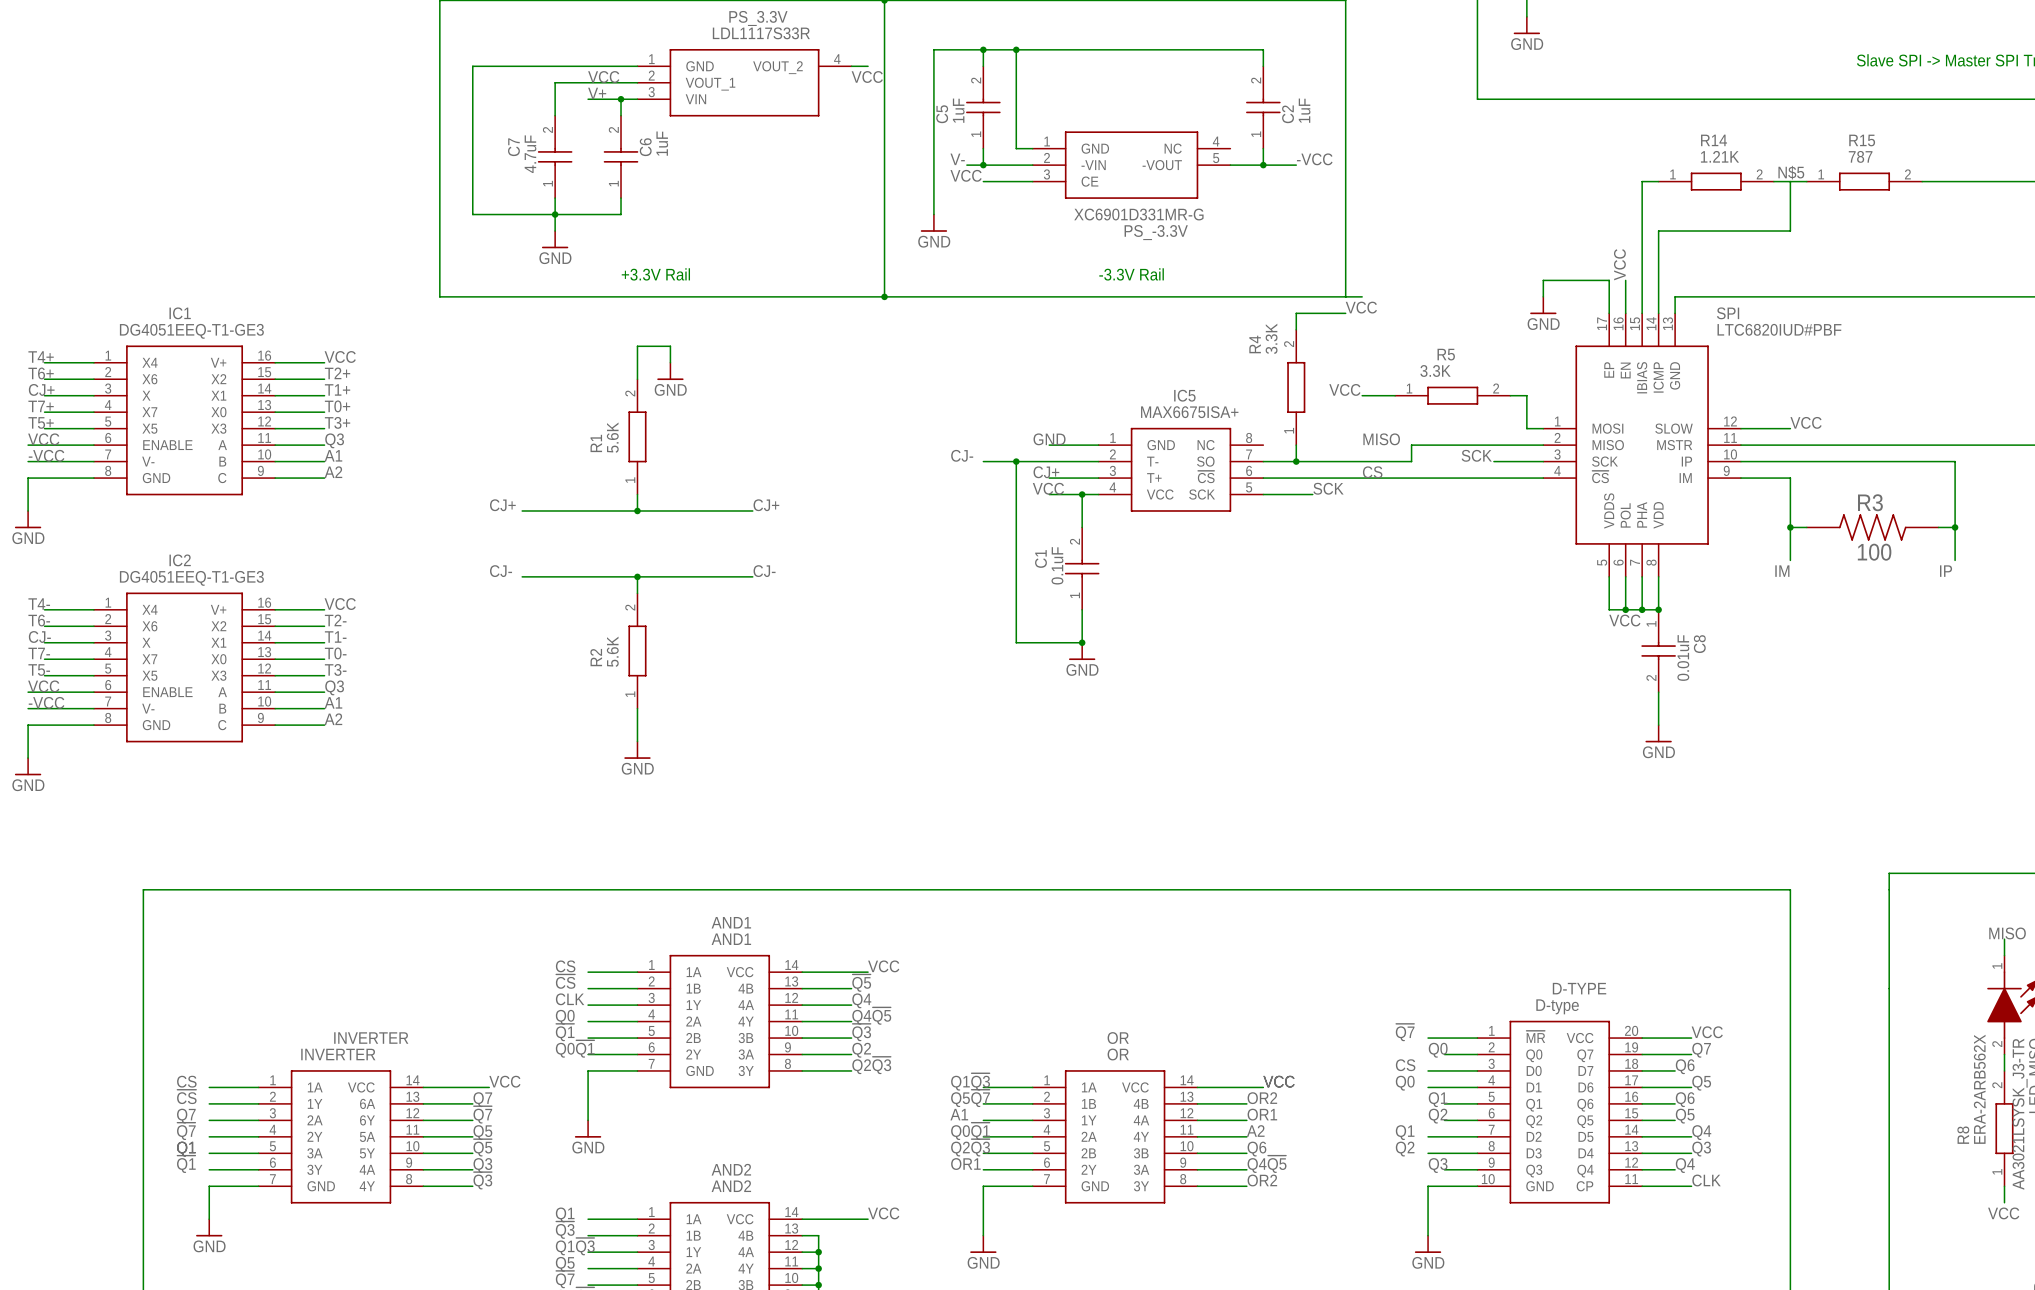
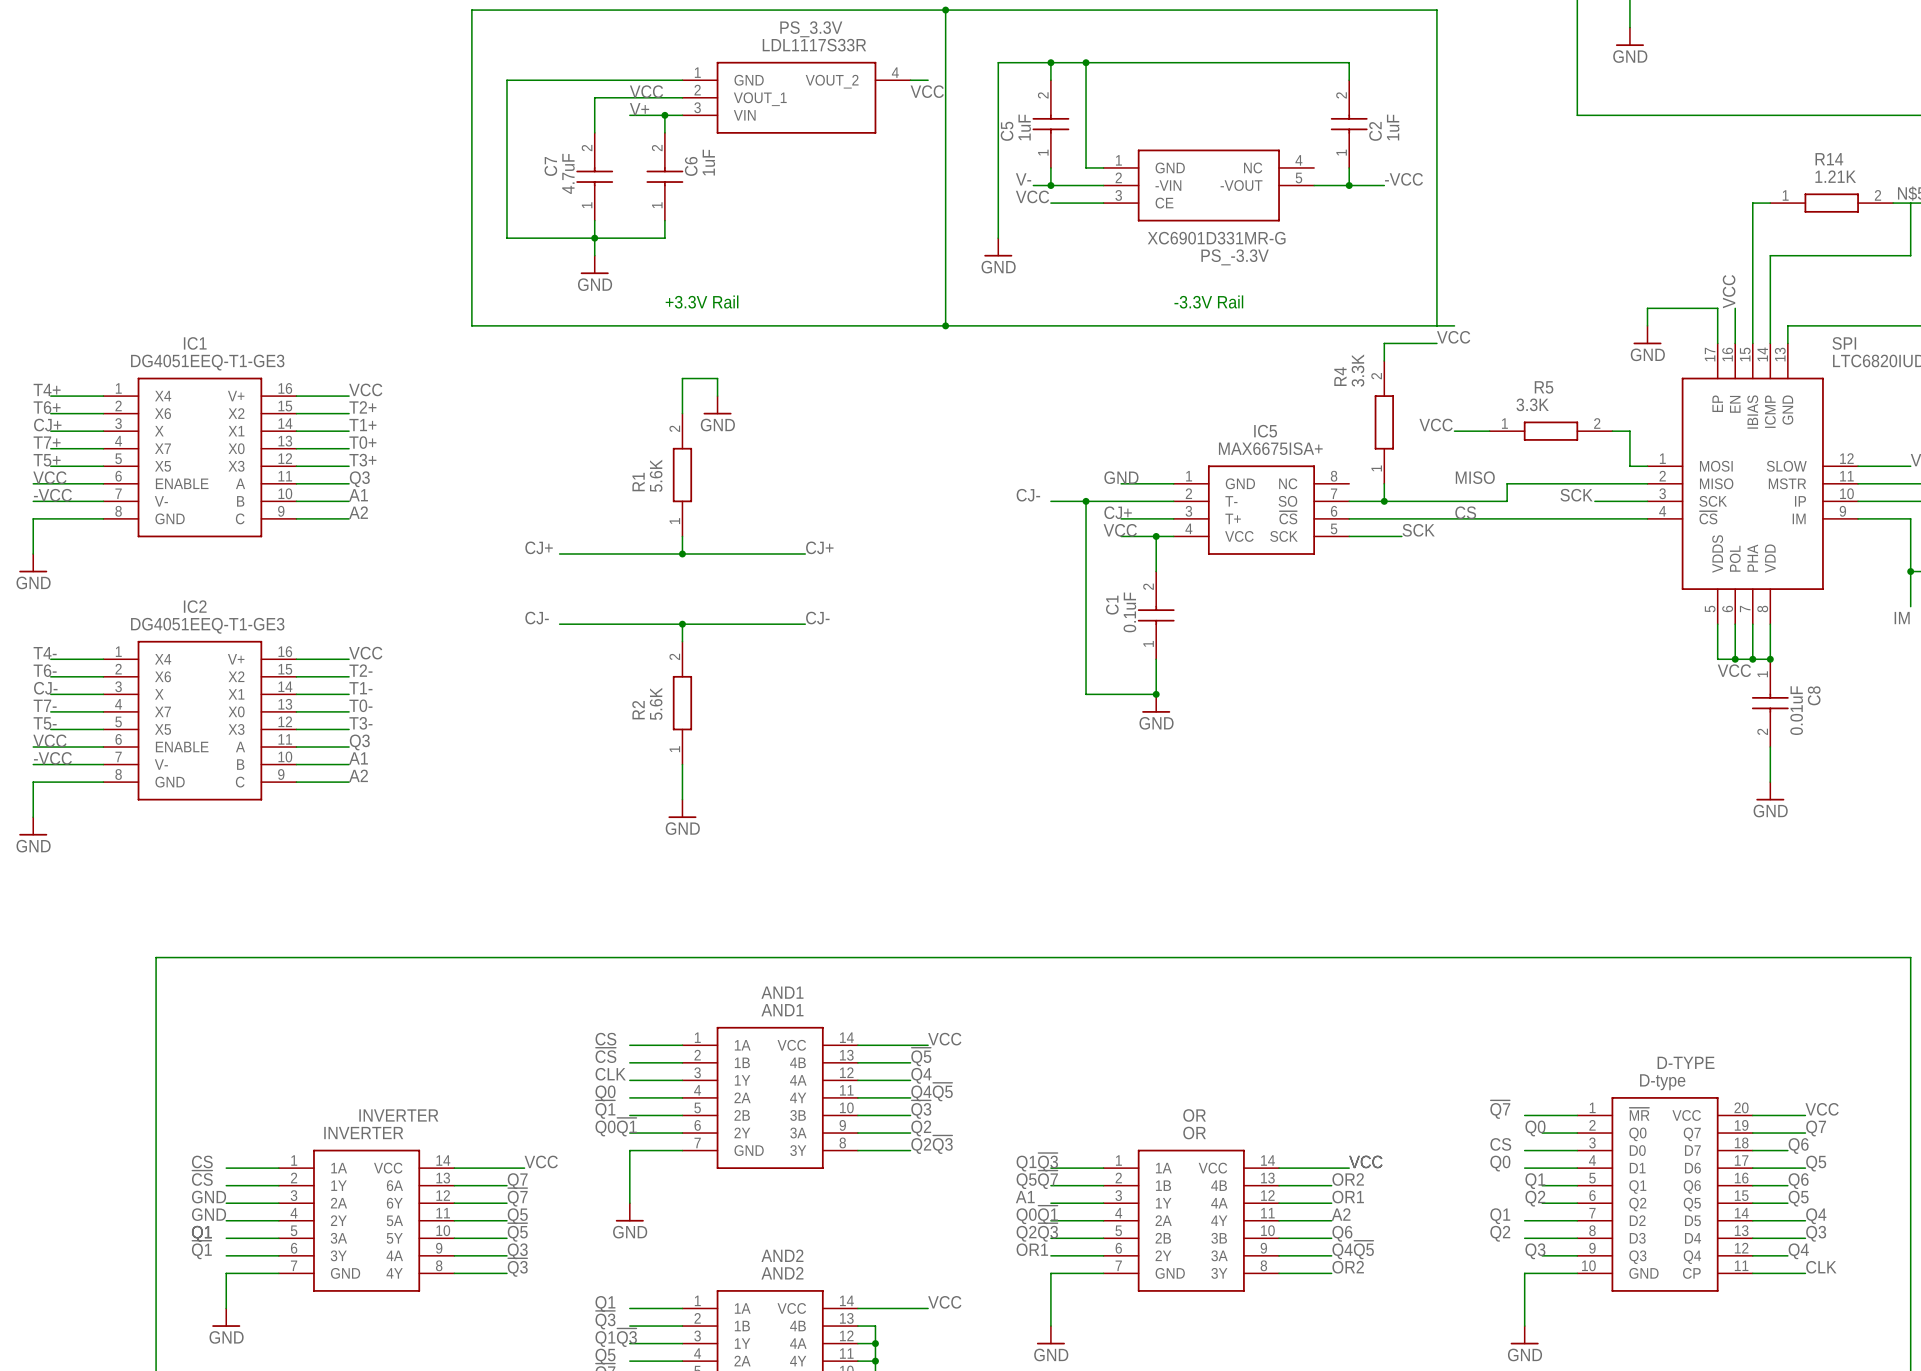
label: Q7 (186, 1116) -> GND (209, 1197)
label: ~{Q7} (186, 1131) -> GND (209, 1214)

